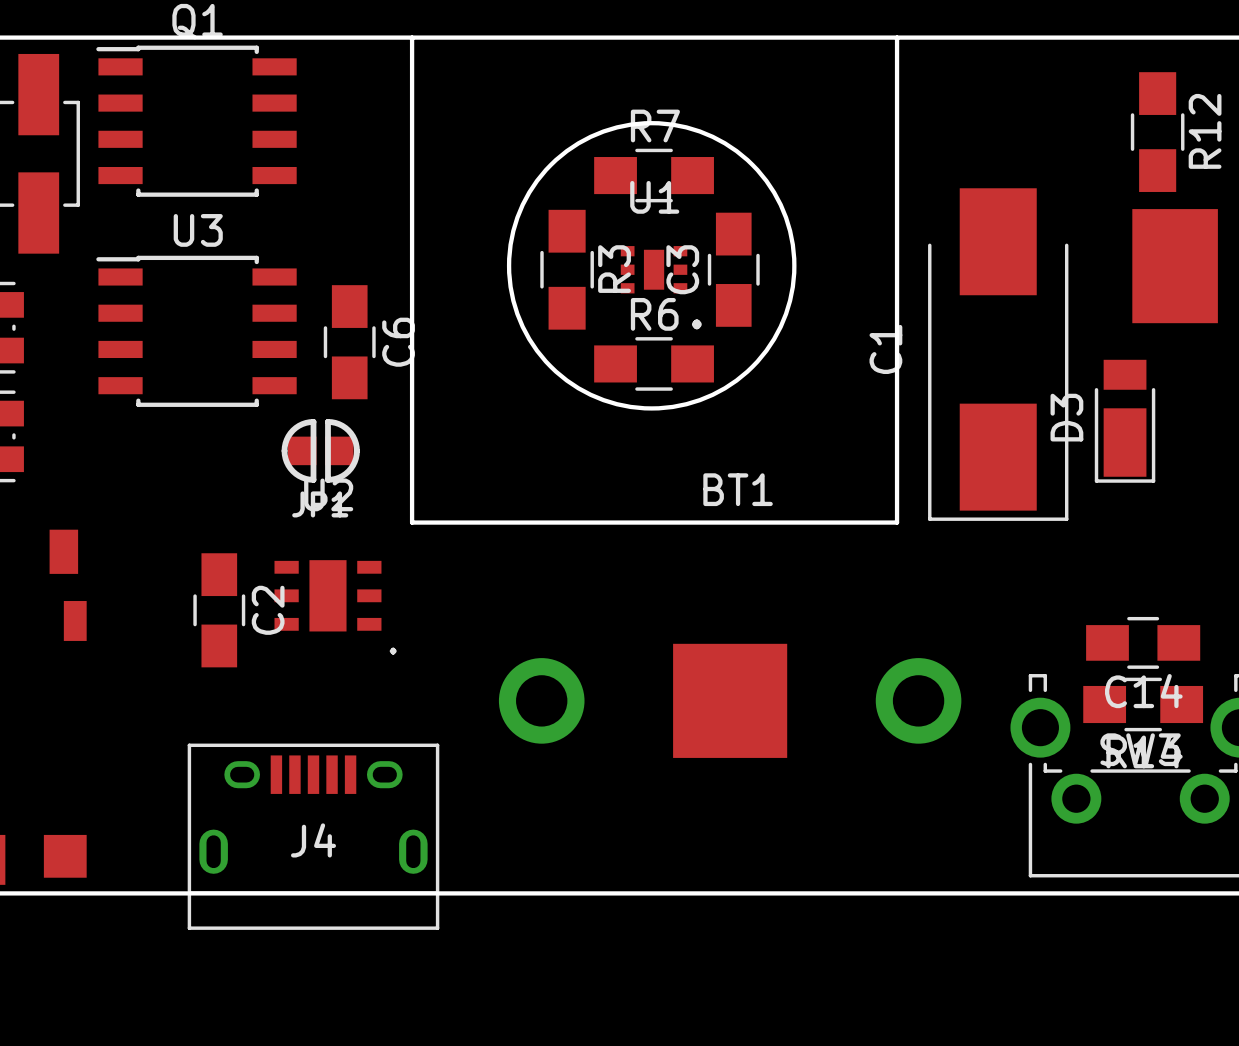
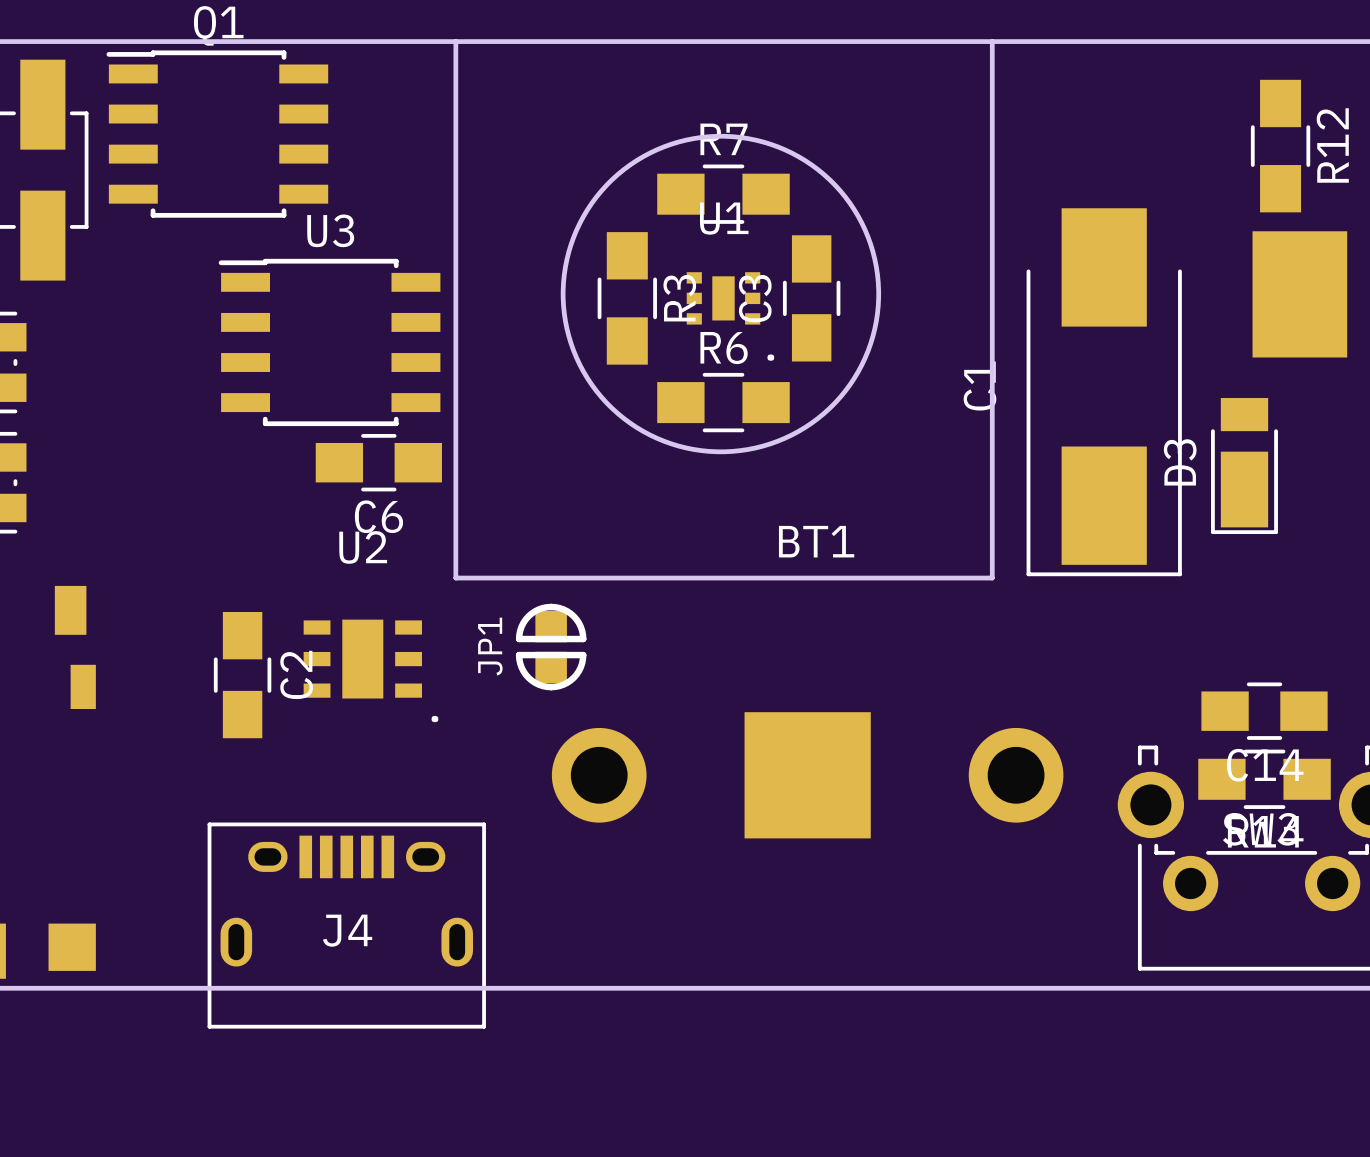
U3 position: (196, 331) -> (329, 342)
C6 rotation: 0° (349, 342) -> 90° clockwise (378, 462)
C6 position: (349, 342) -> (378, 462)
JP1 rotation: 0° (320, 450) -> 90° clockwise (551, 647)
JP1 position: (320, 450) -> (551, 647)

